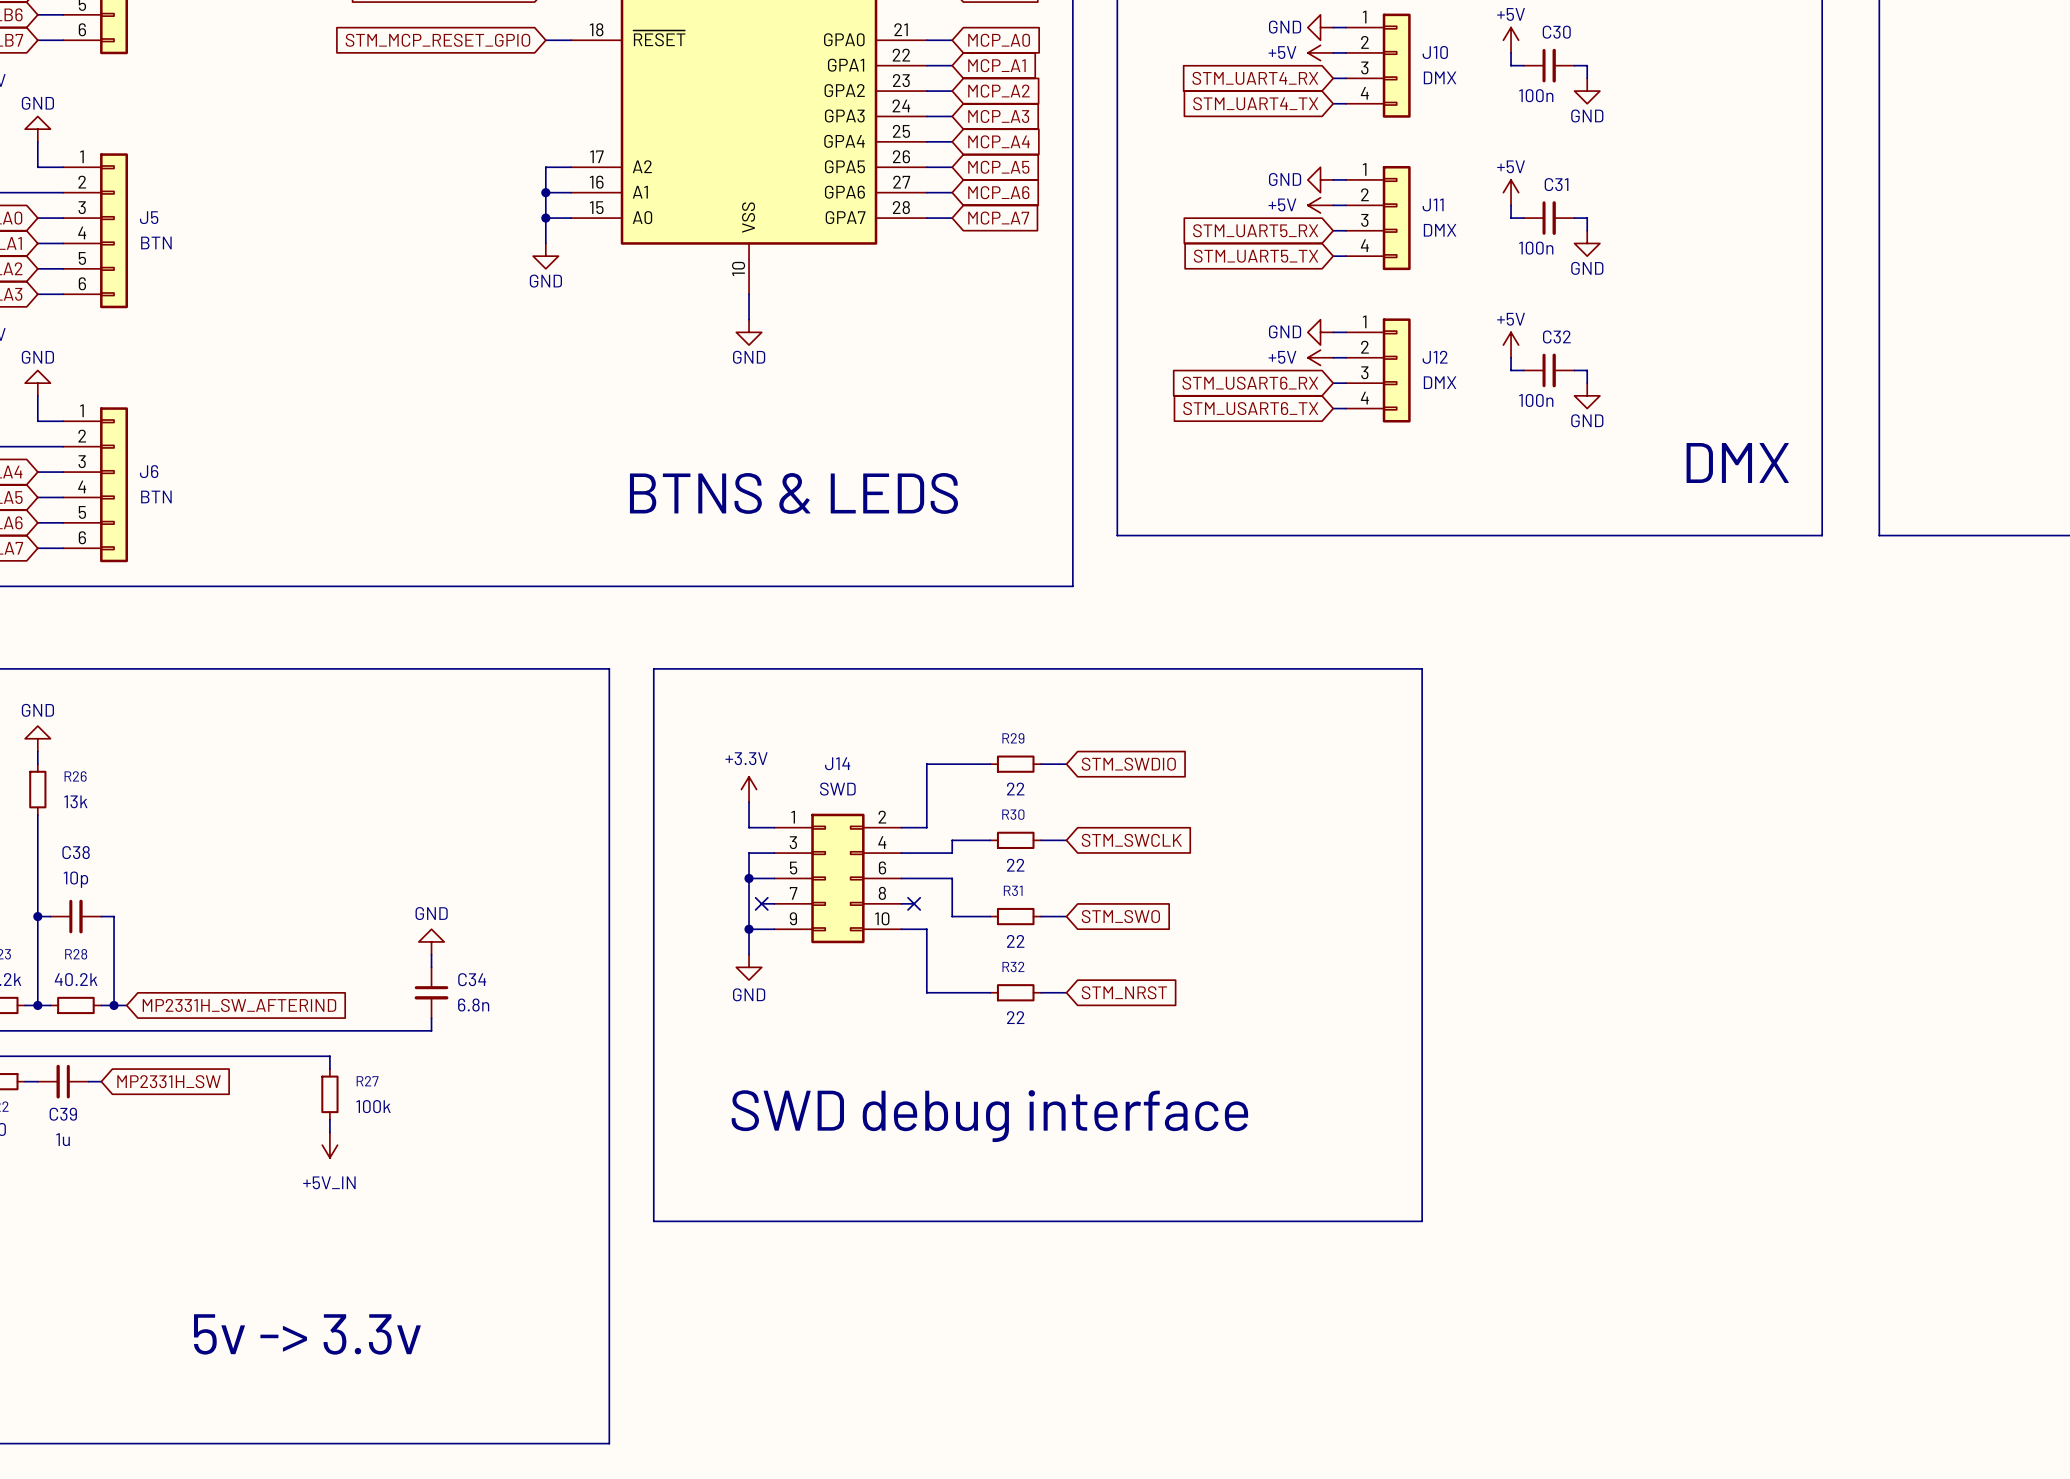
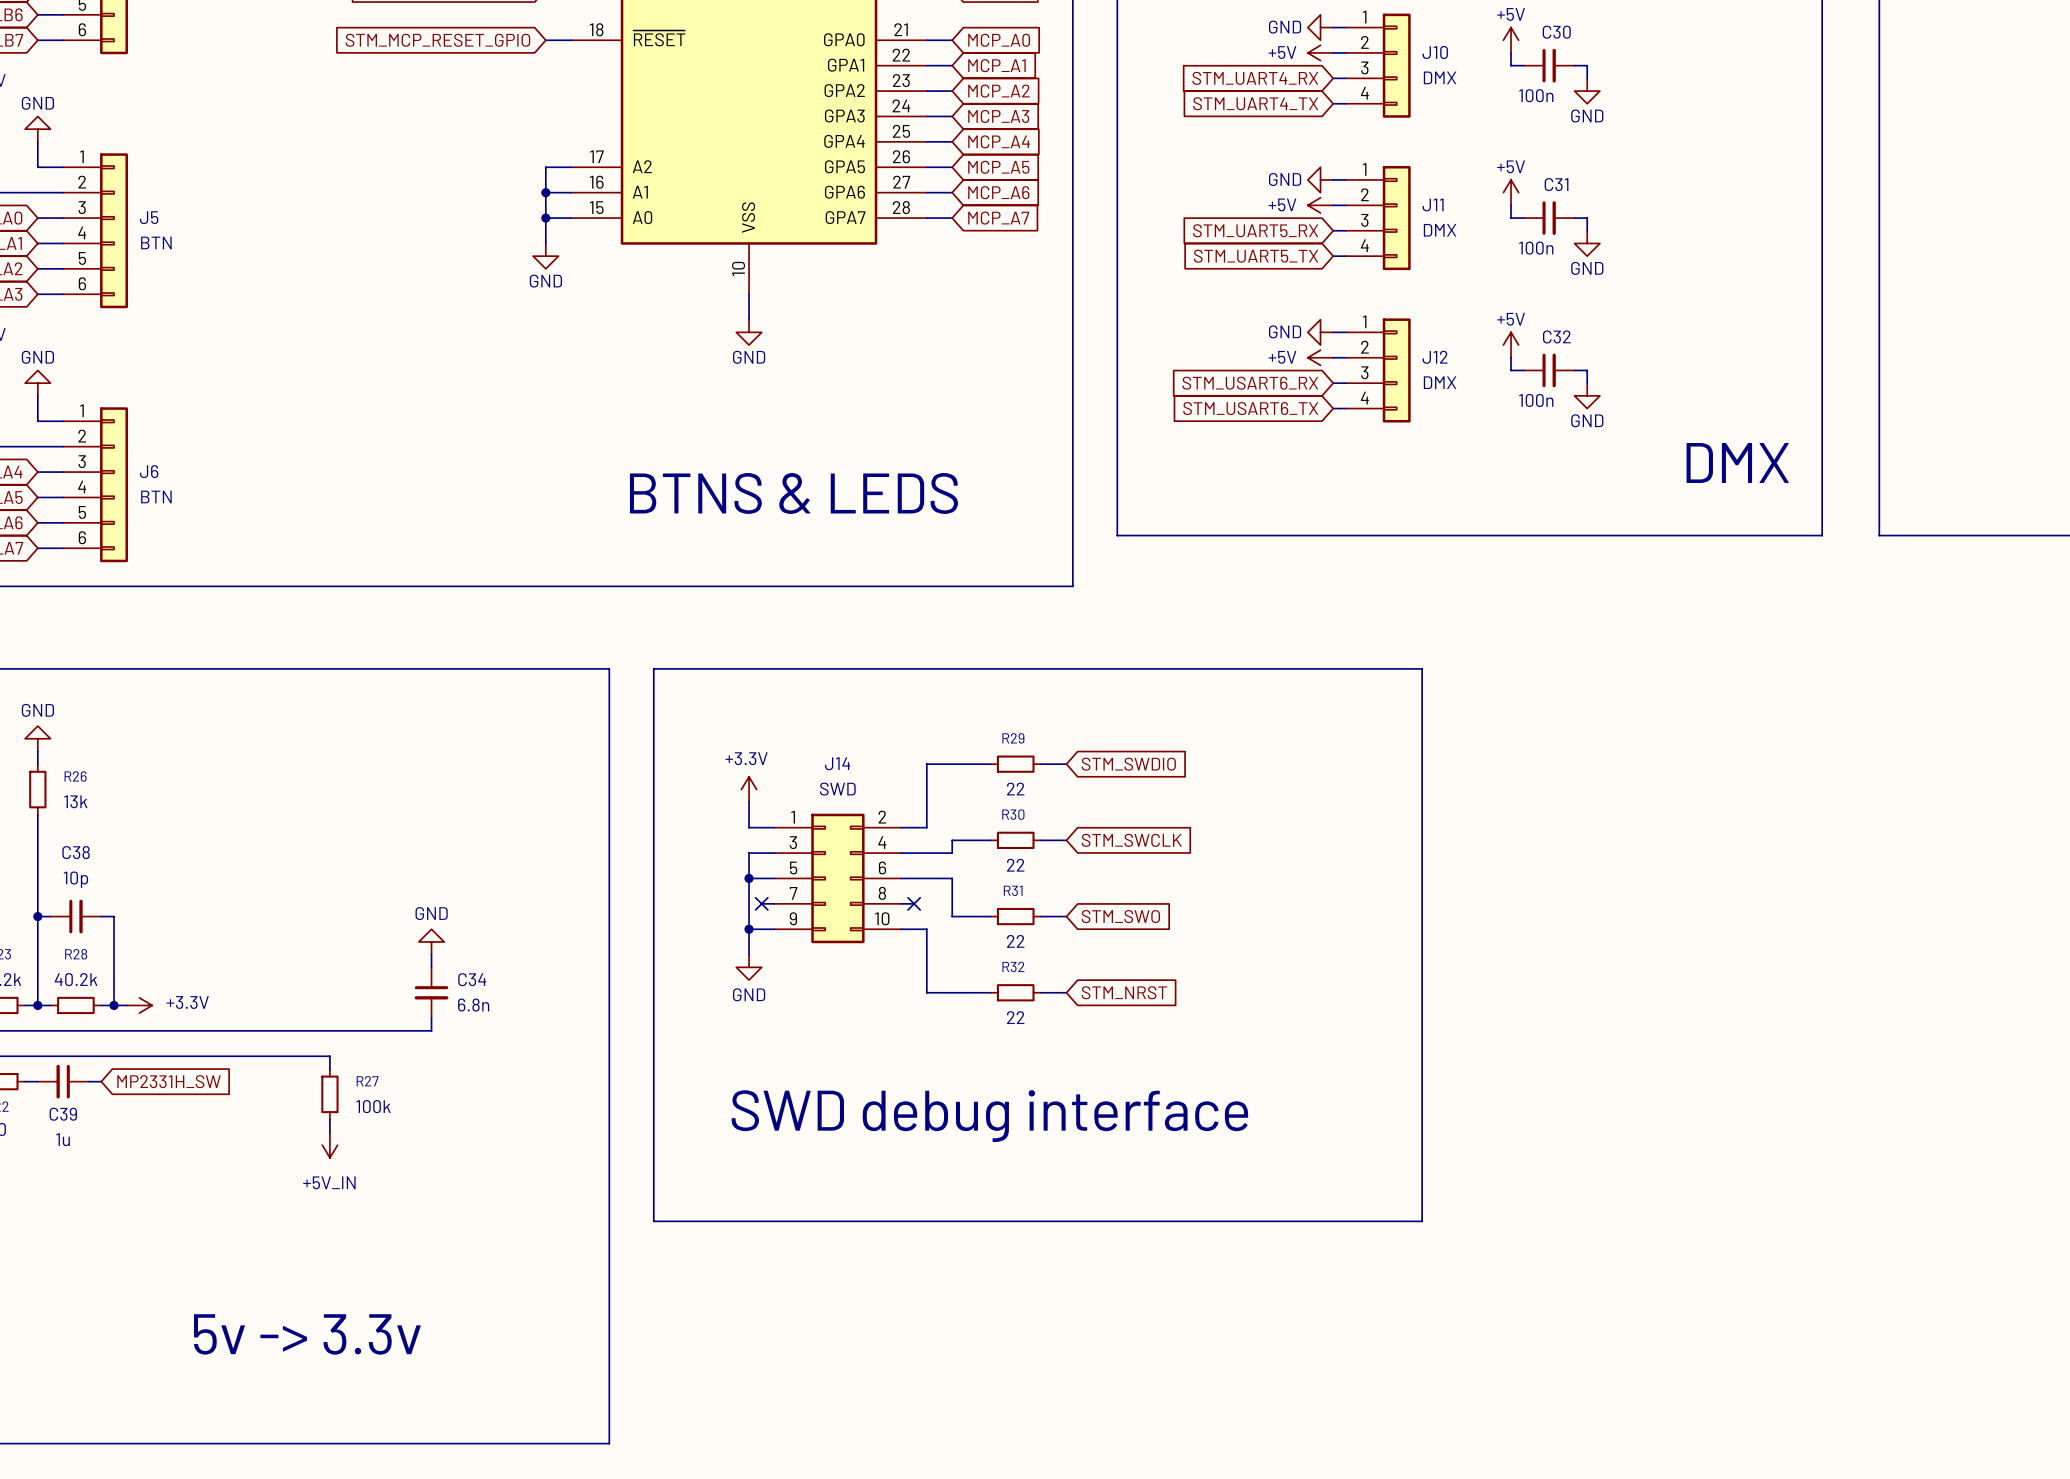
power symbol: none -> +3.3V (139, 1005)
global label: MP2331H_SW_AFTERIND (239, 1005) -> none

